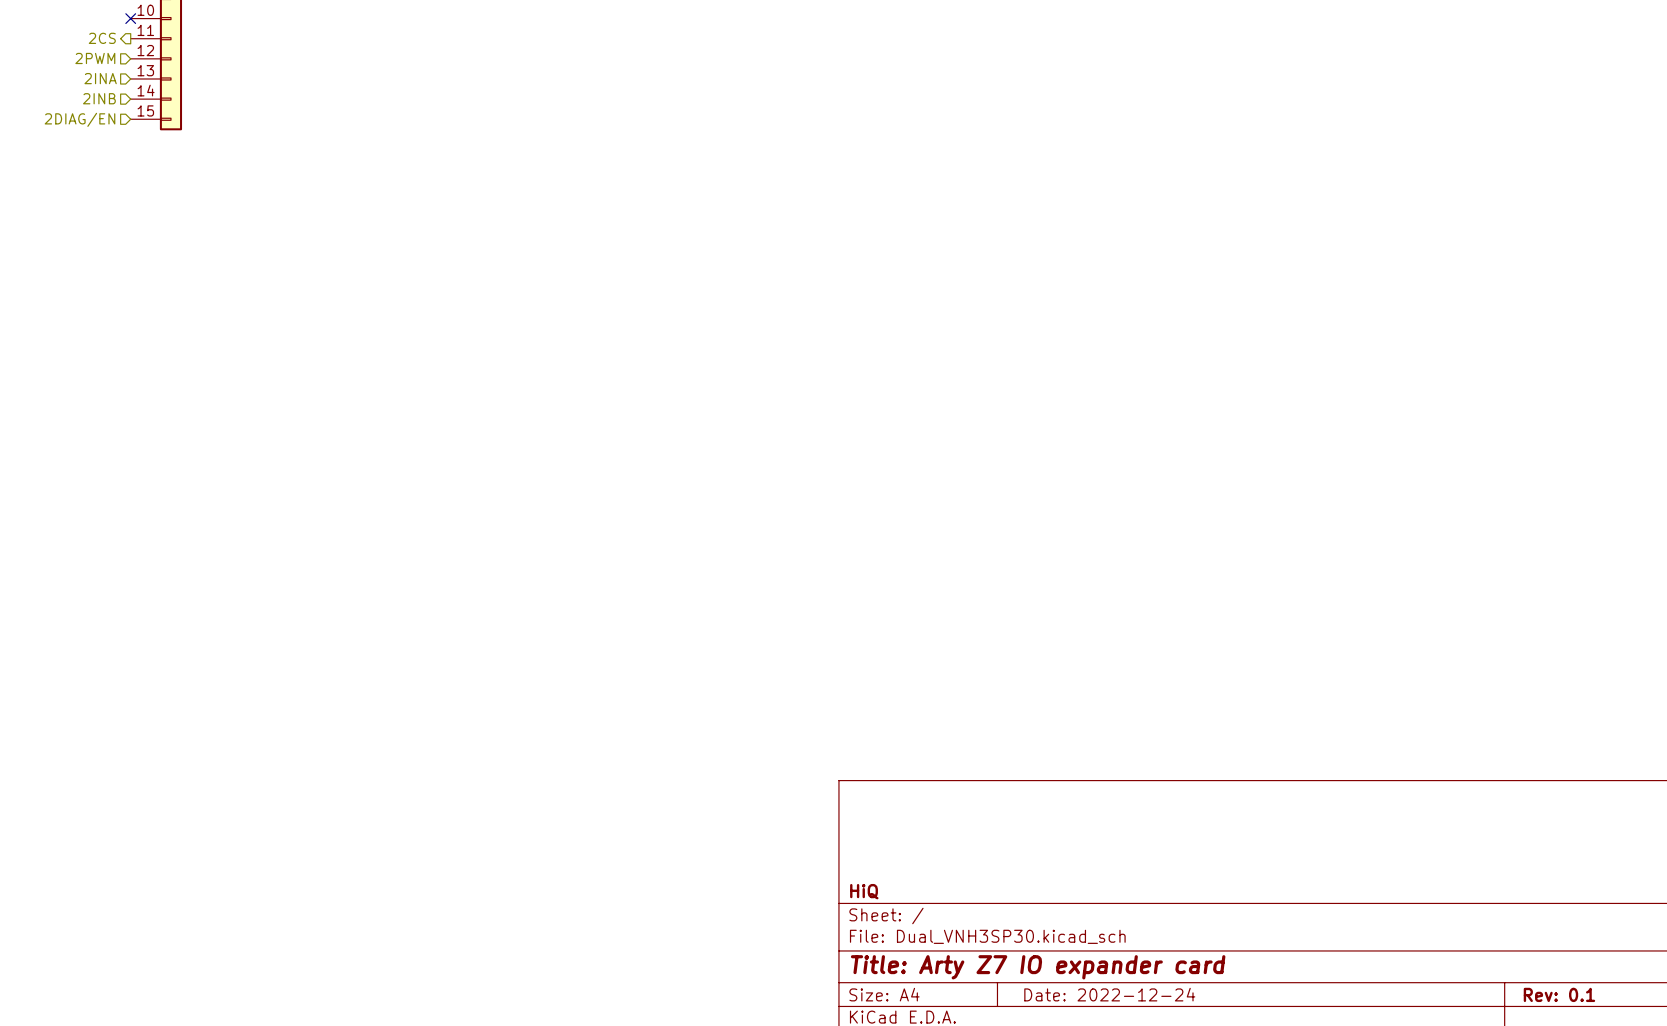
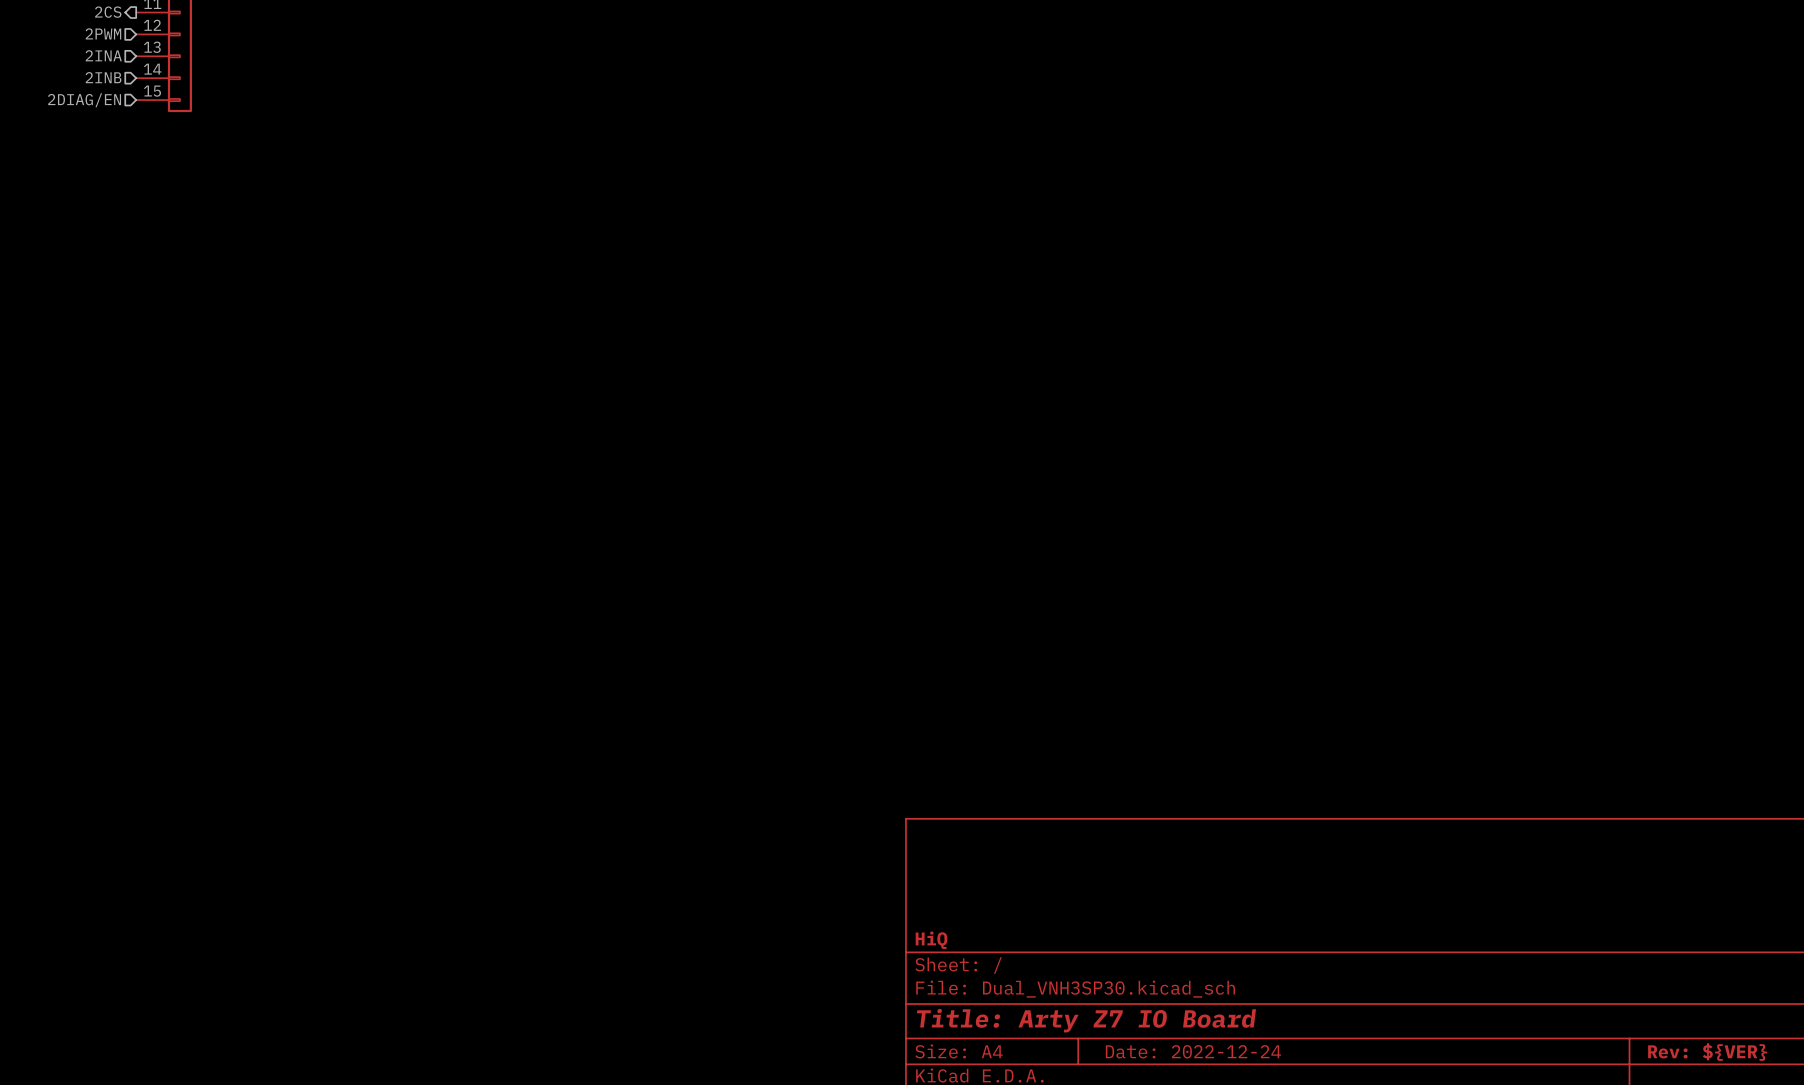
title block: Title: Arty Z7 IO expander card (1038, 967) -> Title: Arty Z7 IO Board (1086, 1020)
title block: Rev: 0.1 (1559, 994) -> Rev: ${VER} (1707, 1052)

